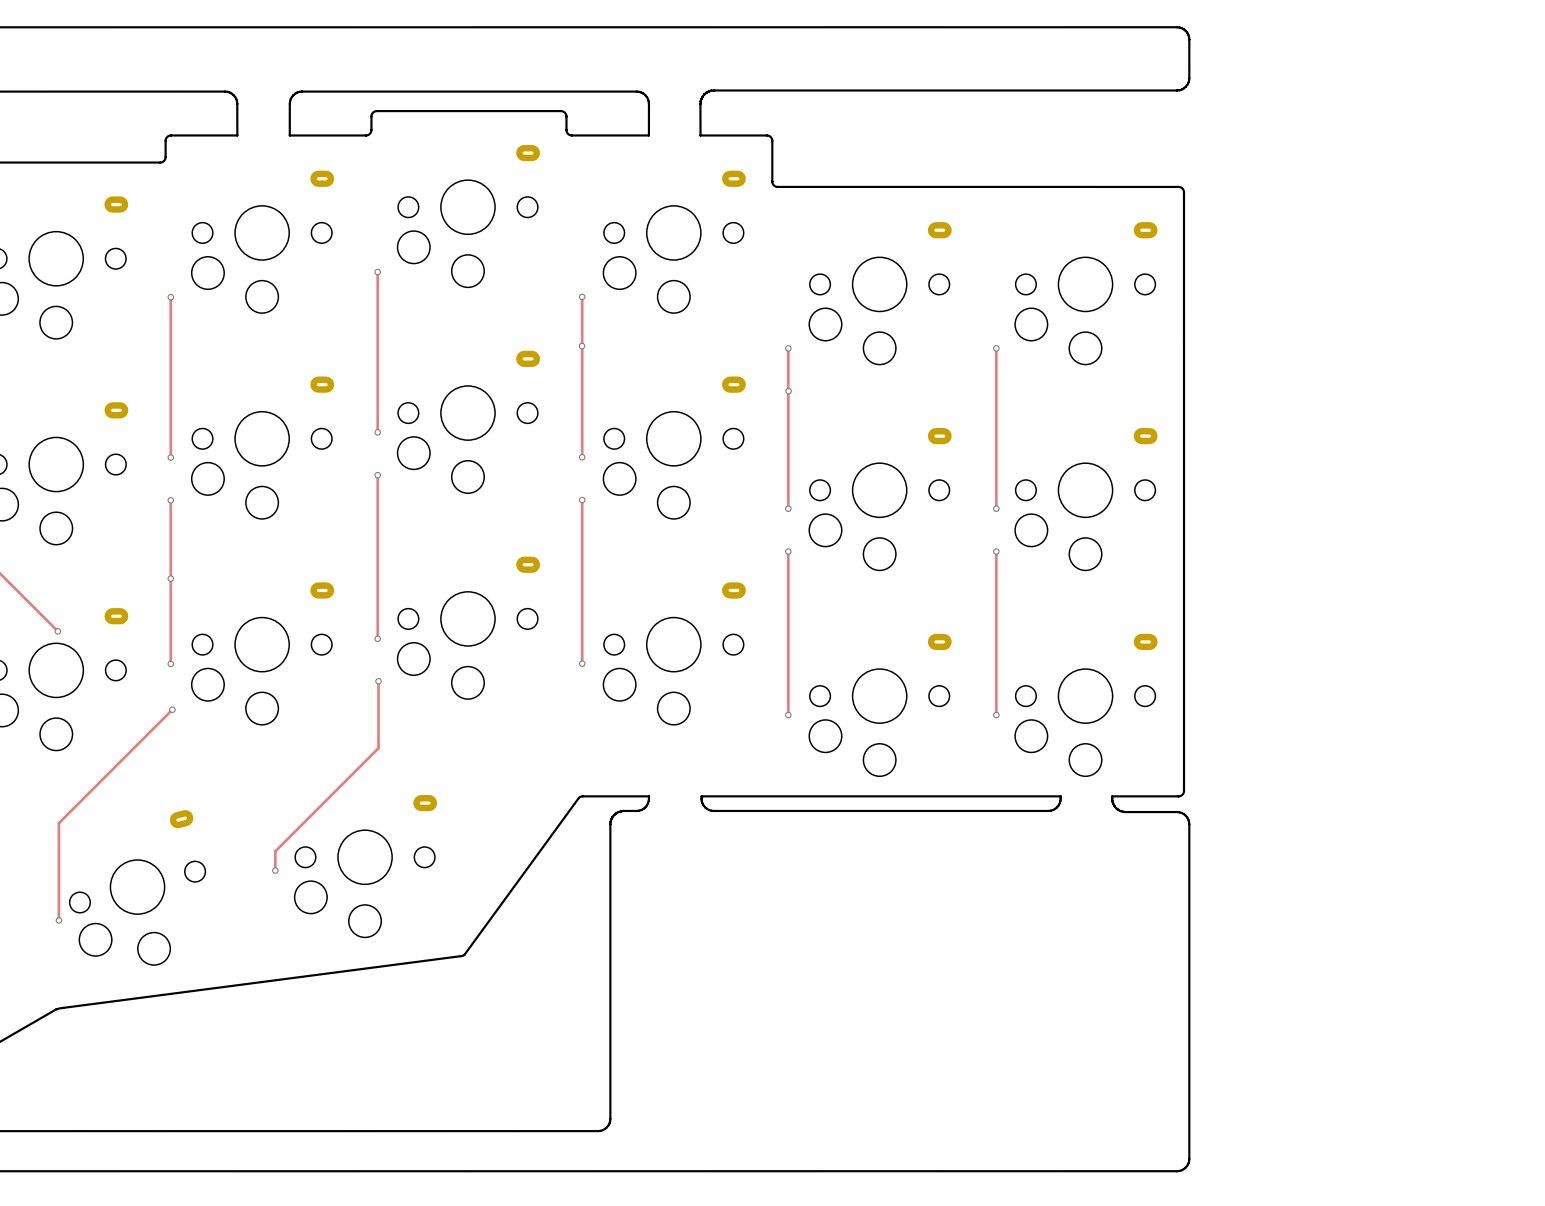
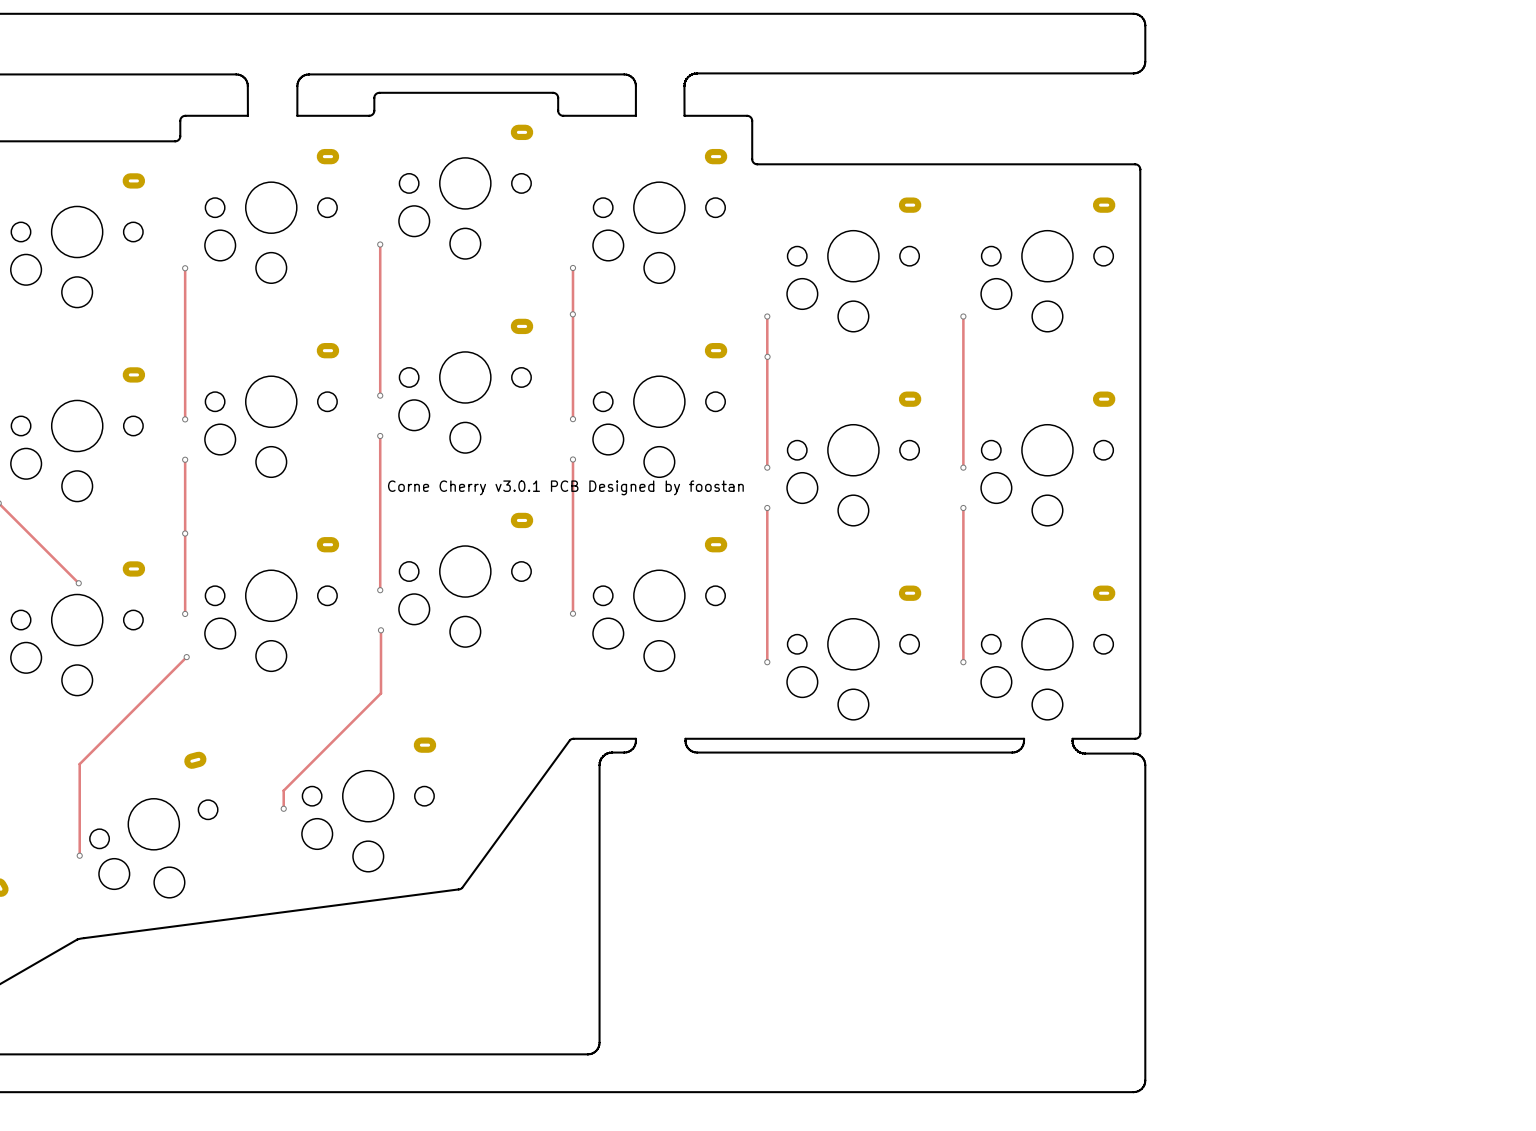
text: none -> Corne Cherry v3.0.1 PCB Designed by foostan (565, 487)

